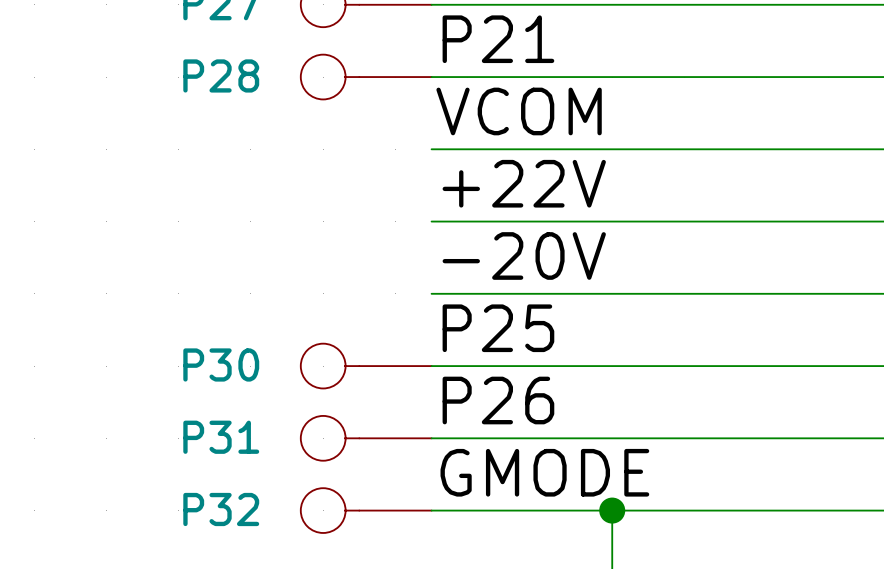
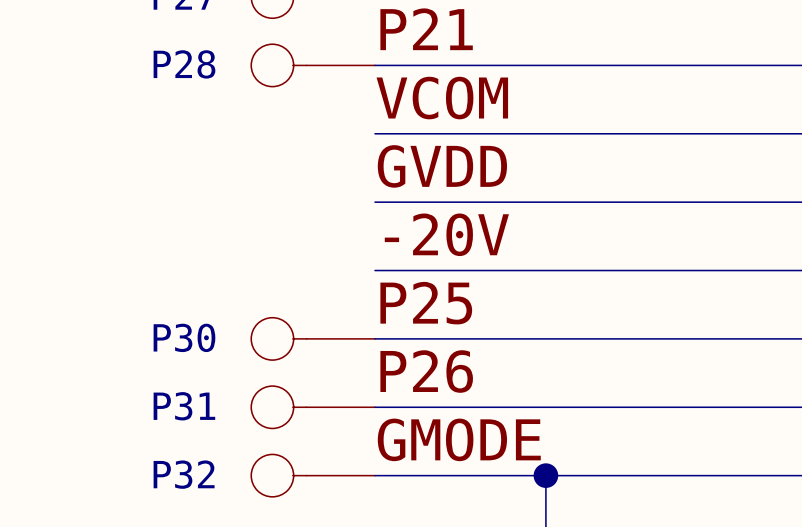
label: +22V (524, 183) -> GVDD (442, 166)

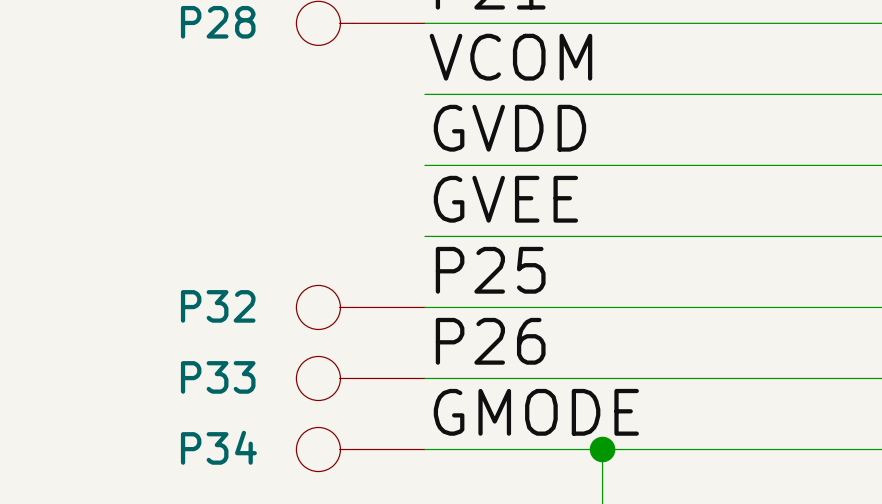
label: -20V (446, 234) -> GVEE (505, 199)
P30 name: P30 (184, 337) -> P32 (218, 306)
P31 name: P31 (184, 406) -> P33 (218, 377)
P32 name: P32 (184, 474) -> P34 (218, 447)

